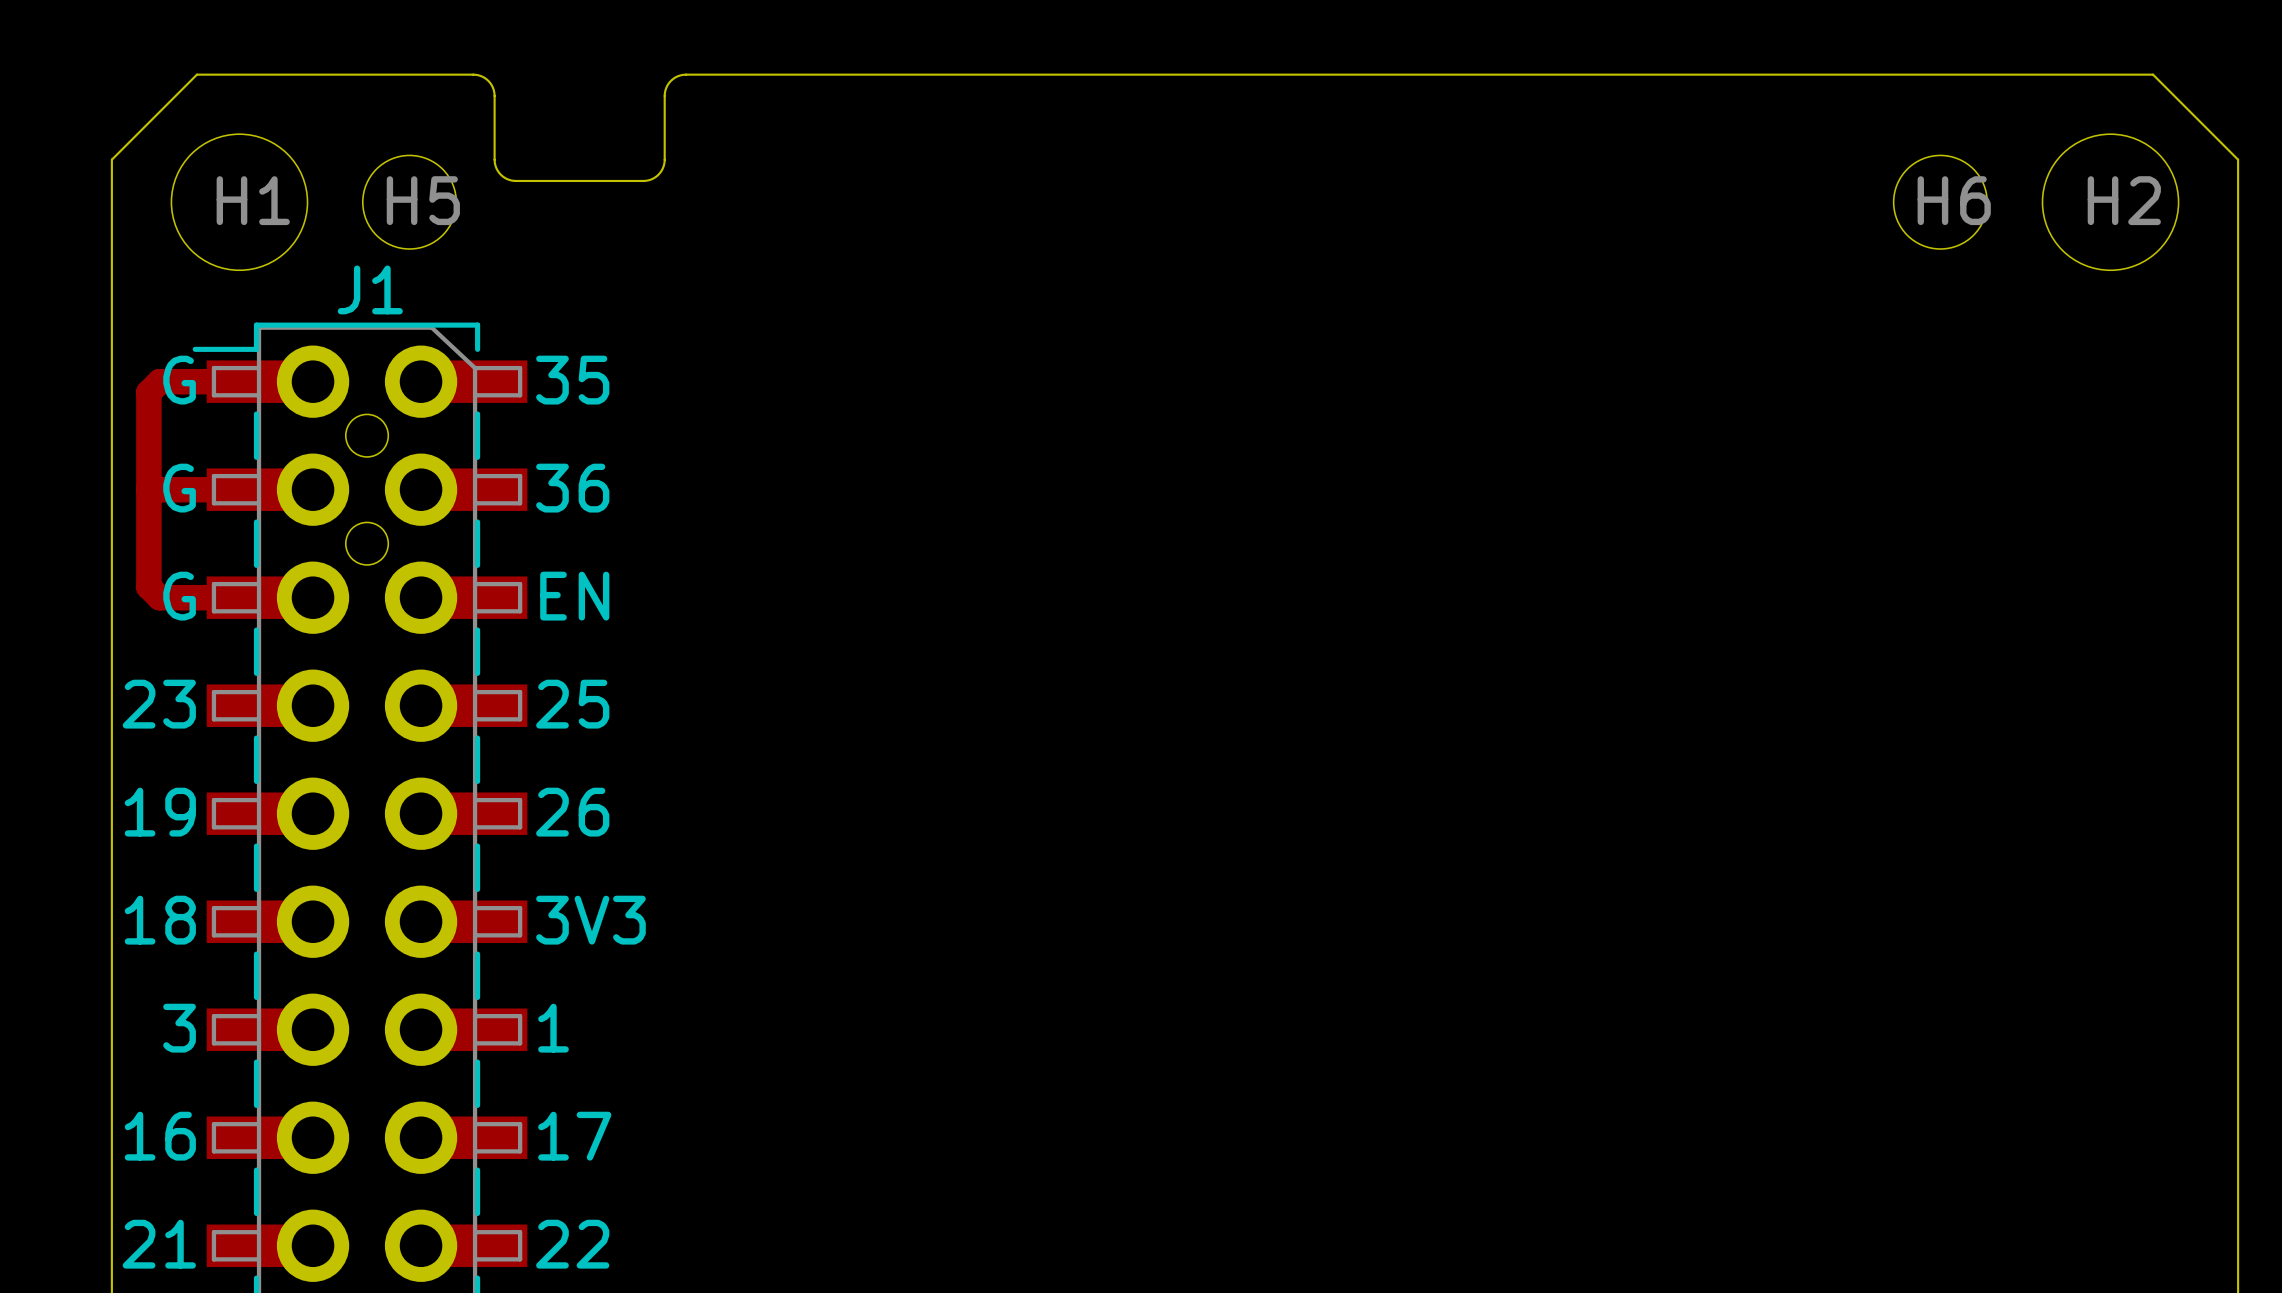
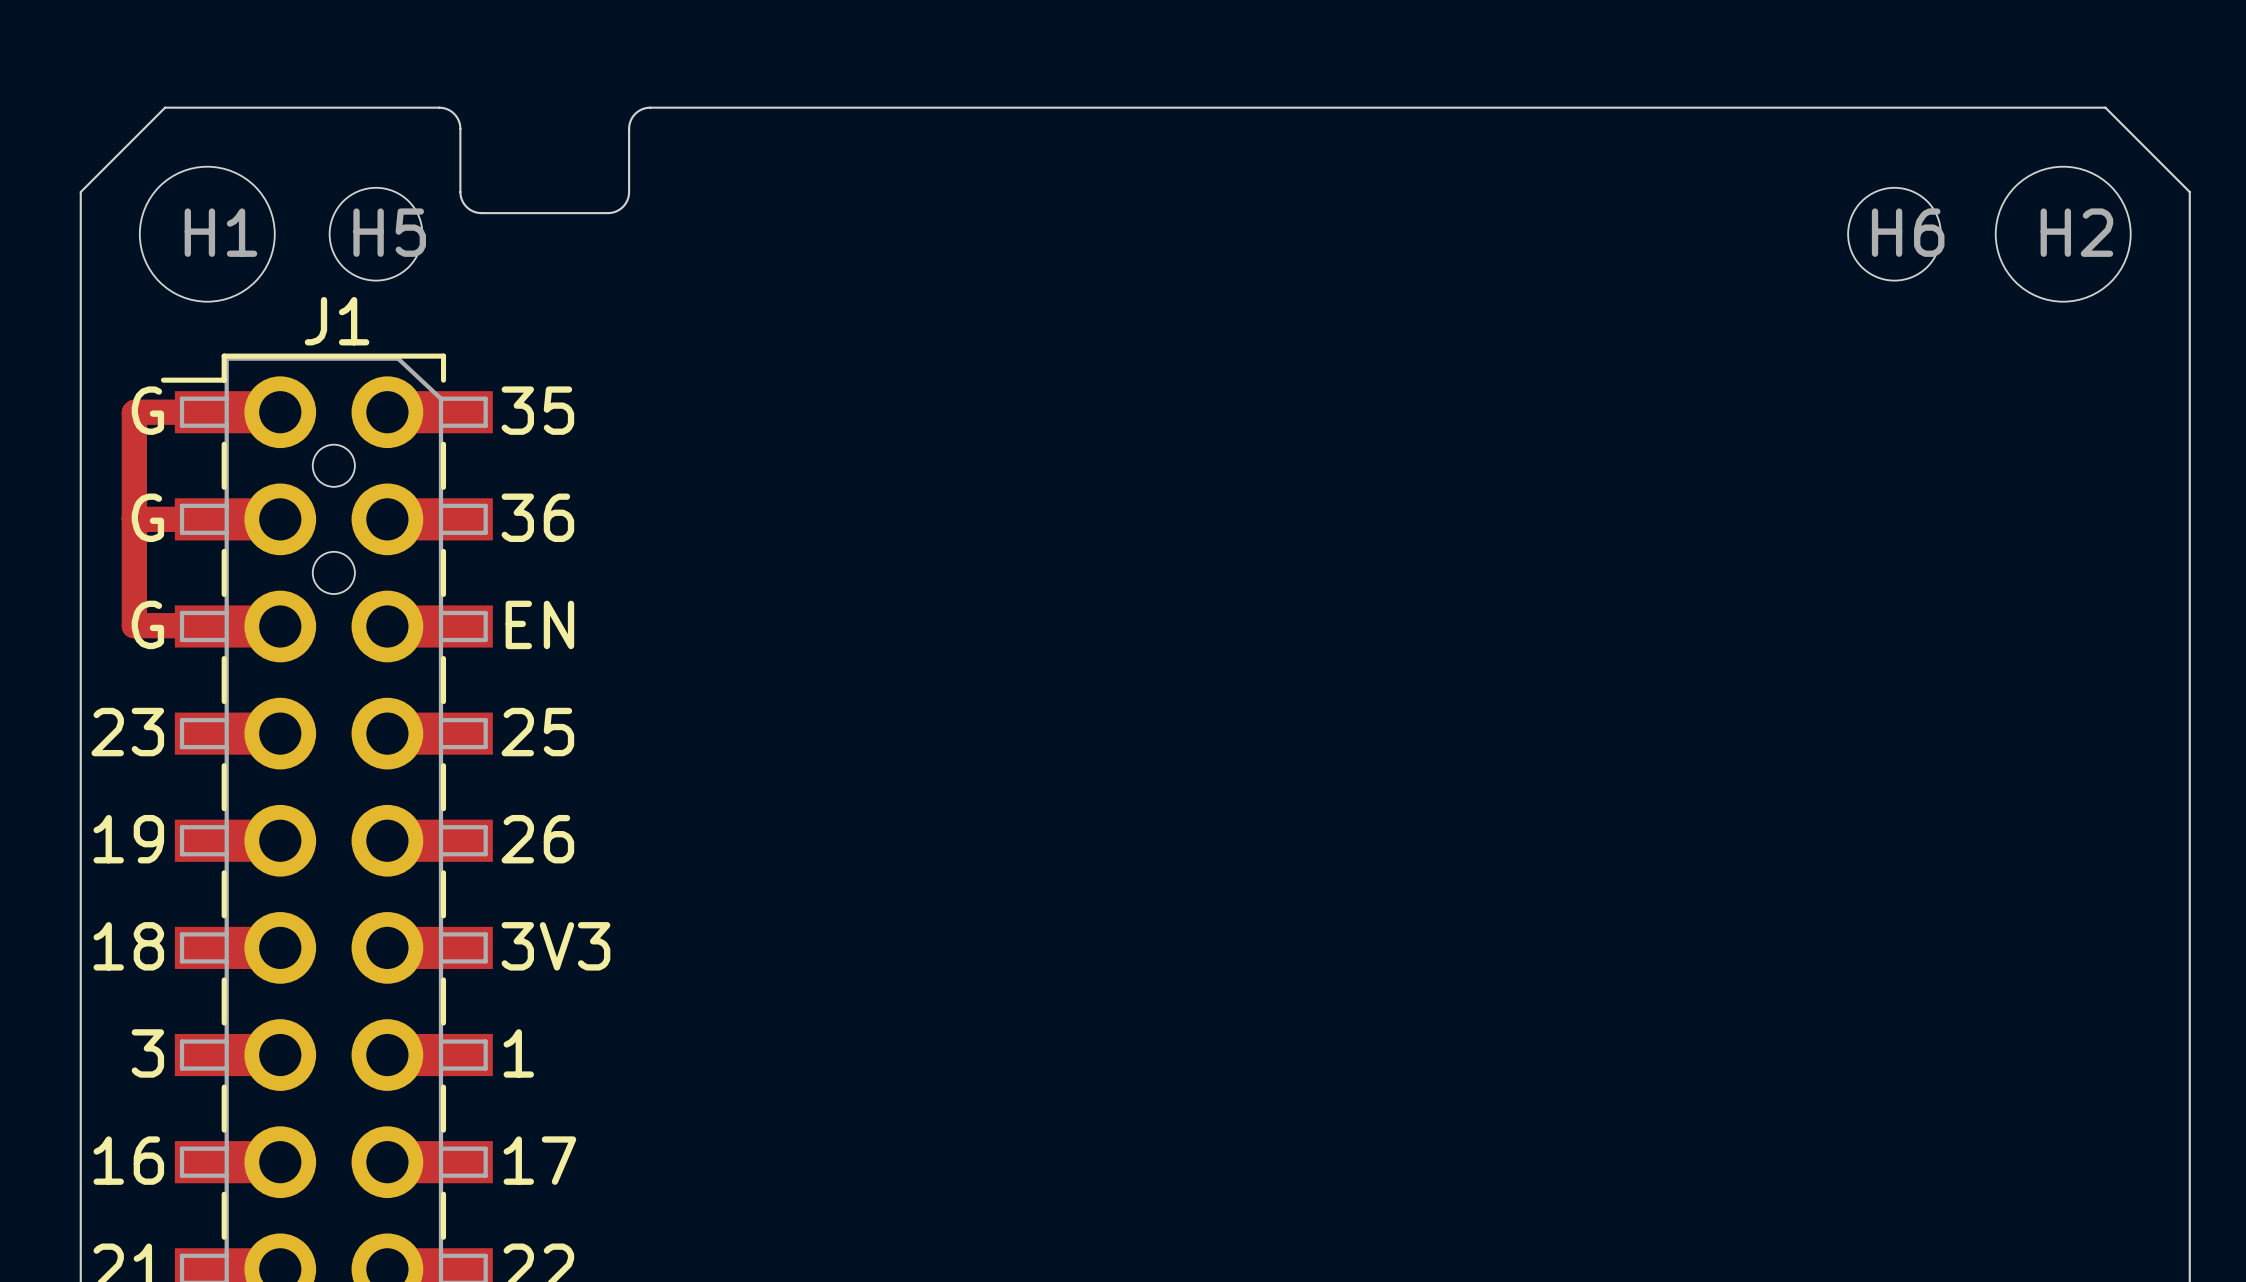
track: (166, 381) (159, 381) (148, 392) (148, 586) (159, 597) (313, 597) -> (135, 412) (134, 625) (280, 626)

